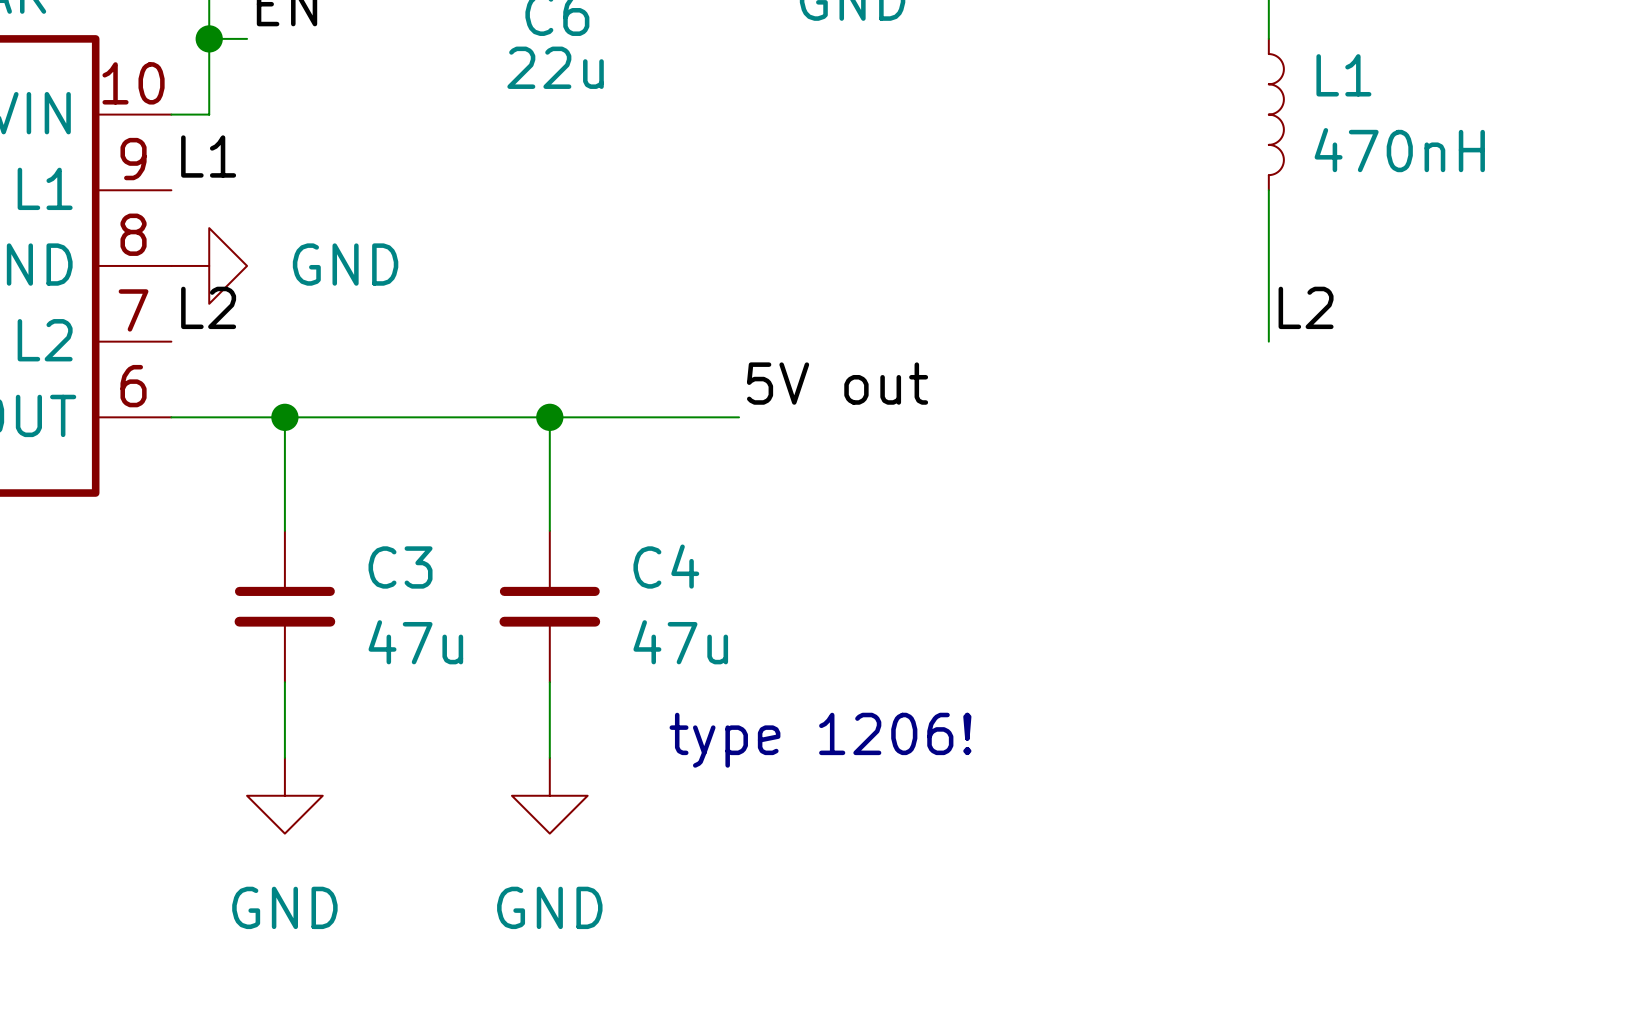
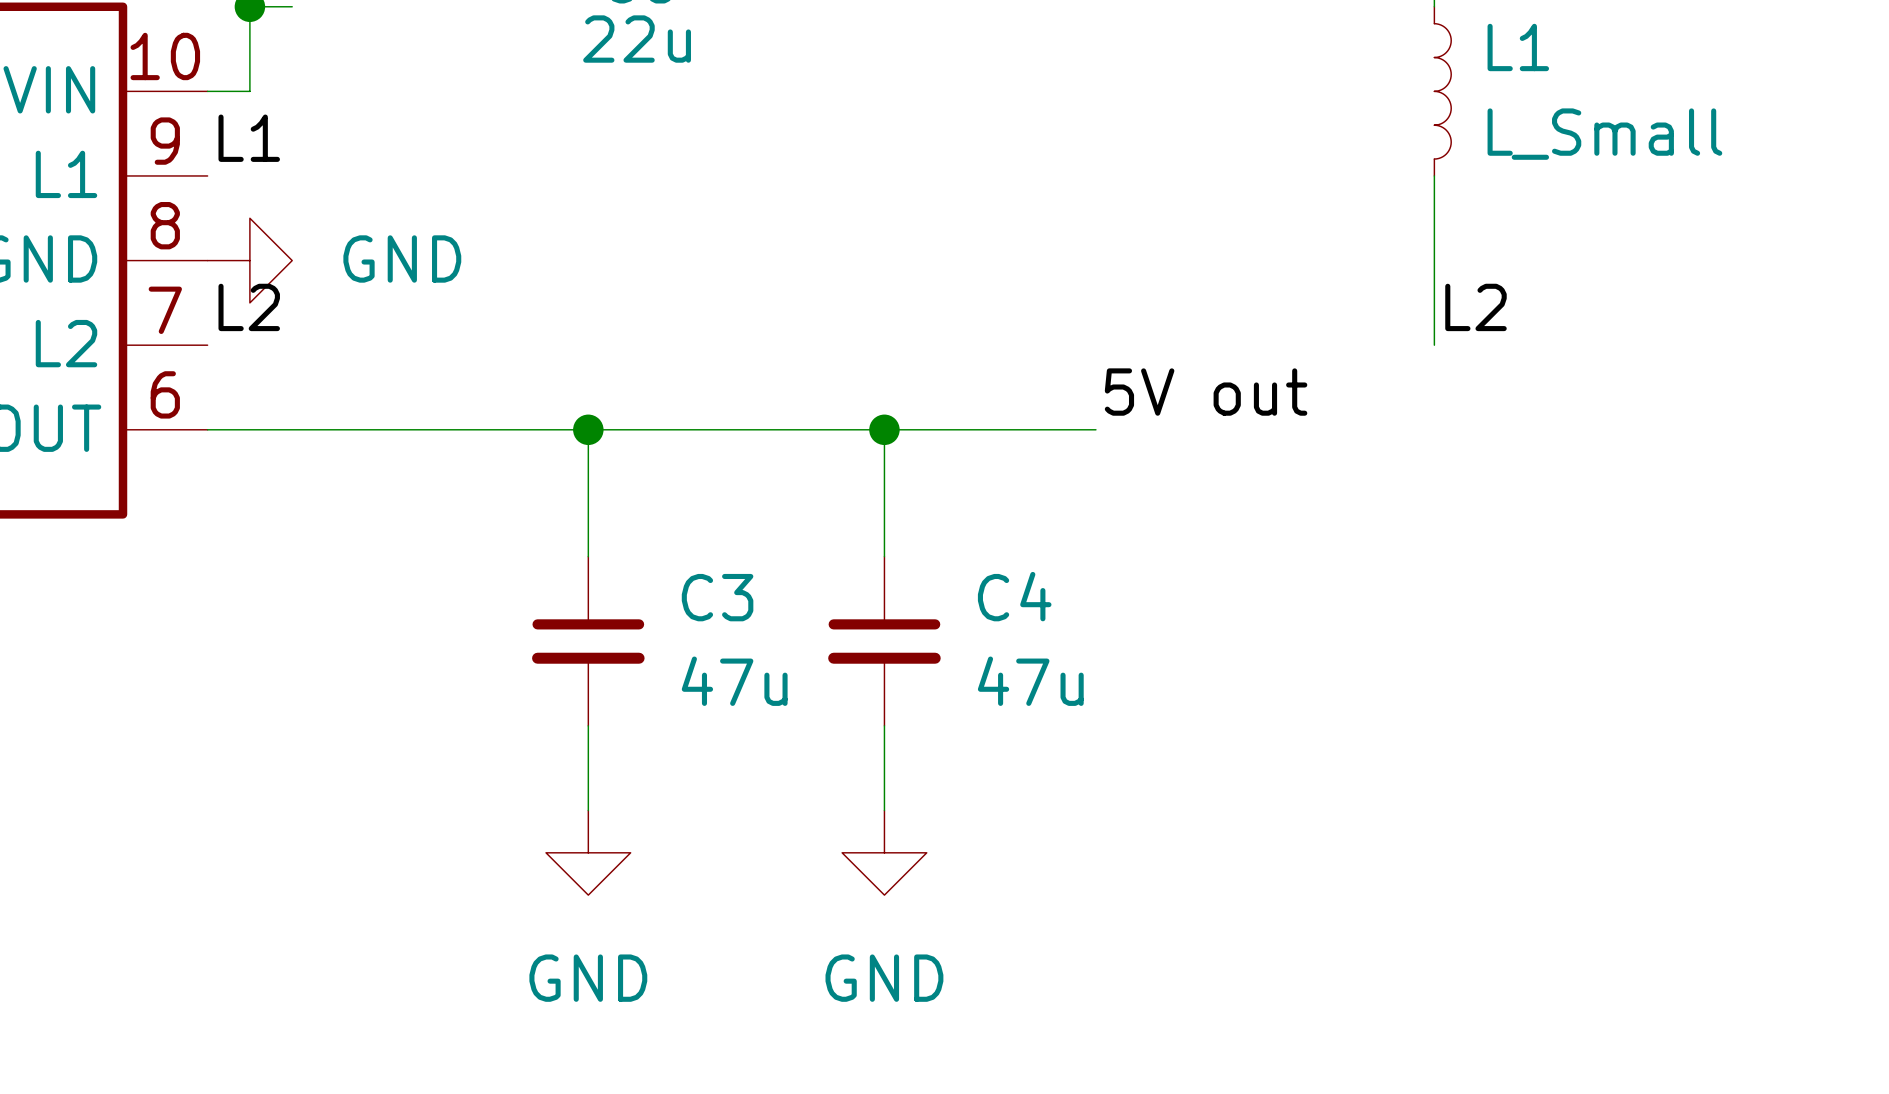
L1 value: 470nH (1399, 150) -> L_Small (1604, 134)
label position: 5V out (837, 383) -> 5V out (1206, 392)
wire: (284, 417) (284, 530) -> (588, 429) (588, 556)
junction: (284, 417) -> none
wire: (549, 417) (549, 530) -> (884, 429) (884, 556)
junction position: (549, 417) -> (588, 429)
wire: none -> (842, 429) (1095, 429)
junction: none -> (884, 429)
C3 position: (284, 606) -> (588, 641)
C4 position: (549, 606) -> (884, 641)
wire: (284, 682) (284, 757) -> (588, 725) (588, 810)
wire: (549, 682) (549, 757) -> (884, 725) (884, 810)
text: type 1206! (820, 740) -> none
power symbol: GND (284, 795) -> none
power symbol position: GND (549, 795) -> GND (588, 852)
power symbol: none -> GND (884, 852)

